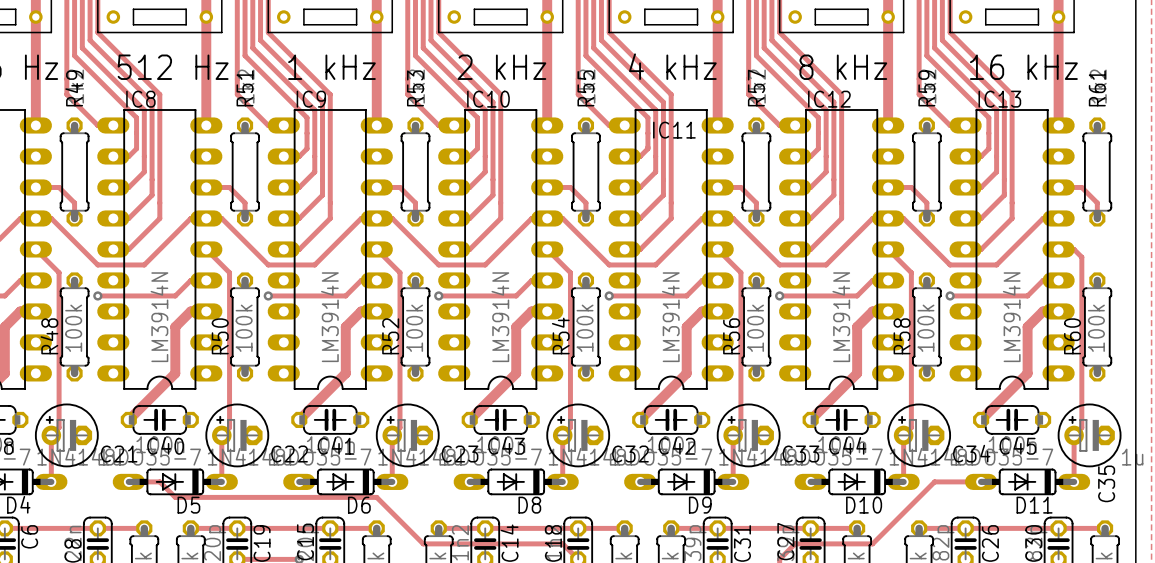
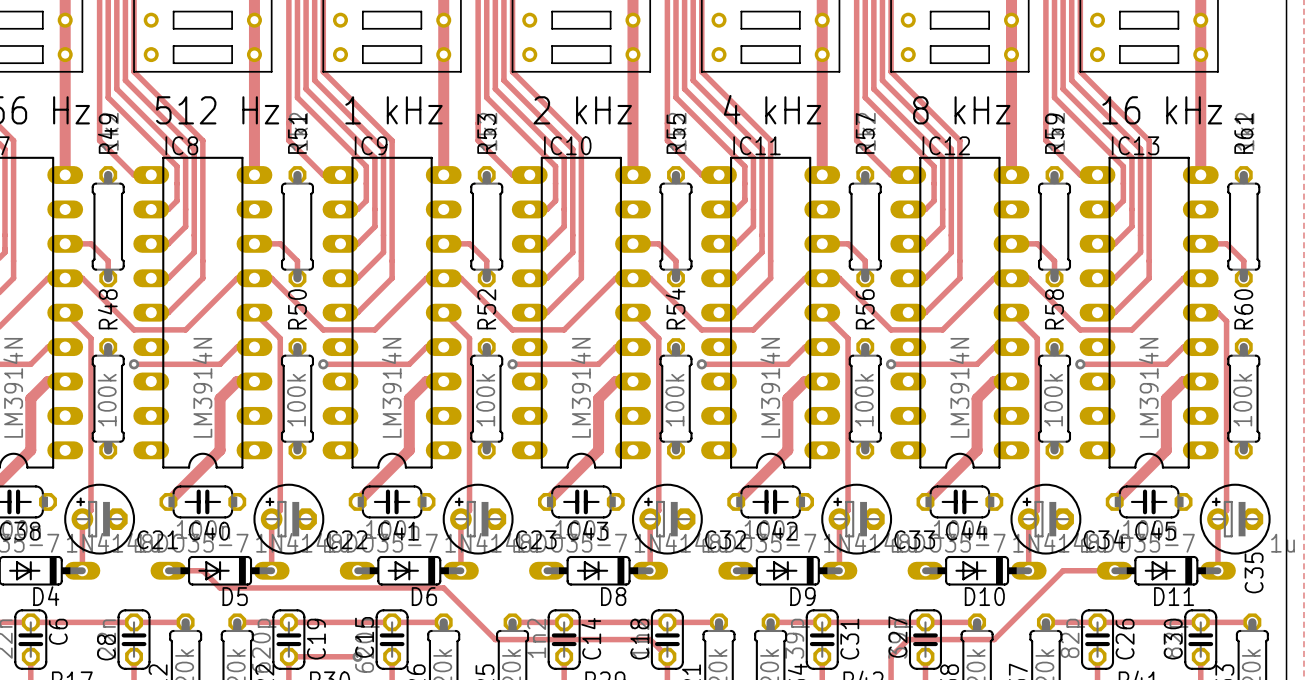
IC11 name position: IC11 (674, 130) -> IC11 (757, 145)
R48 name position: R48 (49, 336) -> R48 (107, 309)
R50 name position: R50 (220, 336) -> R50 (297, 309)
R52 name position: R52 (390, 336) -> R52 (486, 309)
R54 name position: R54 (560, 336) -> R54 (675, 308)
R56 name position: R56 (731, 336) -> R56 (865, 309)
R58 name position: R58 (902, 336) -> R58 (1054, 309)
R60 name position: R60 (1072, 336) -> R60 (1243, 309)

